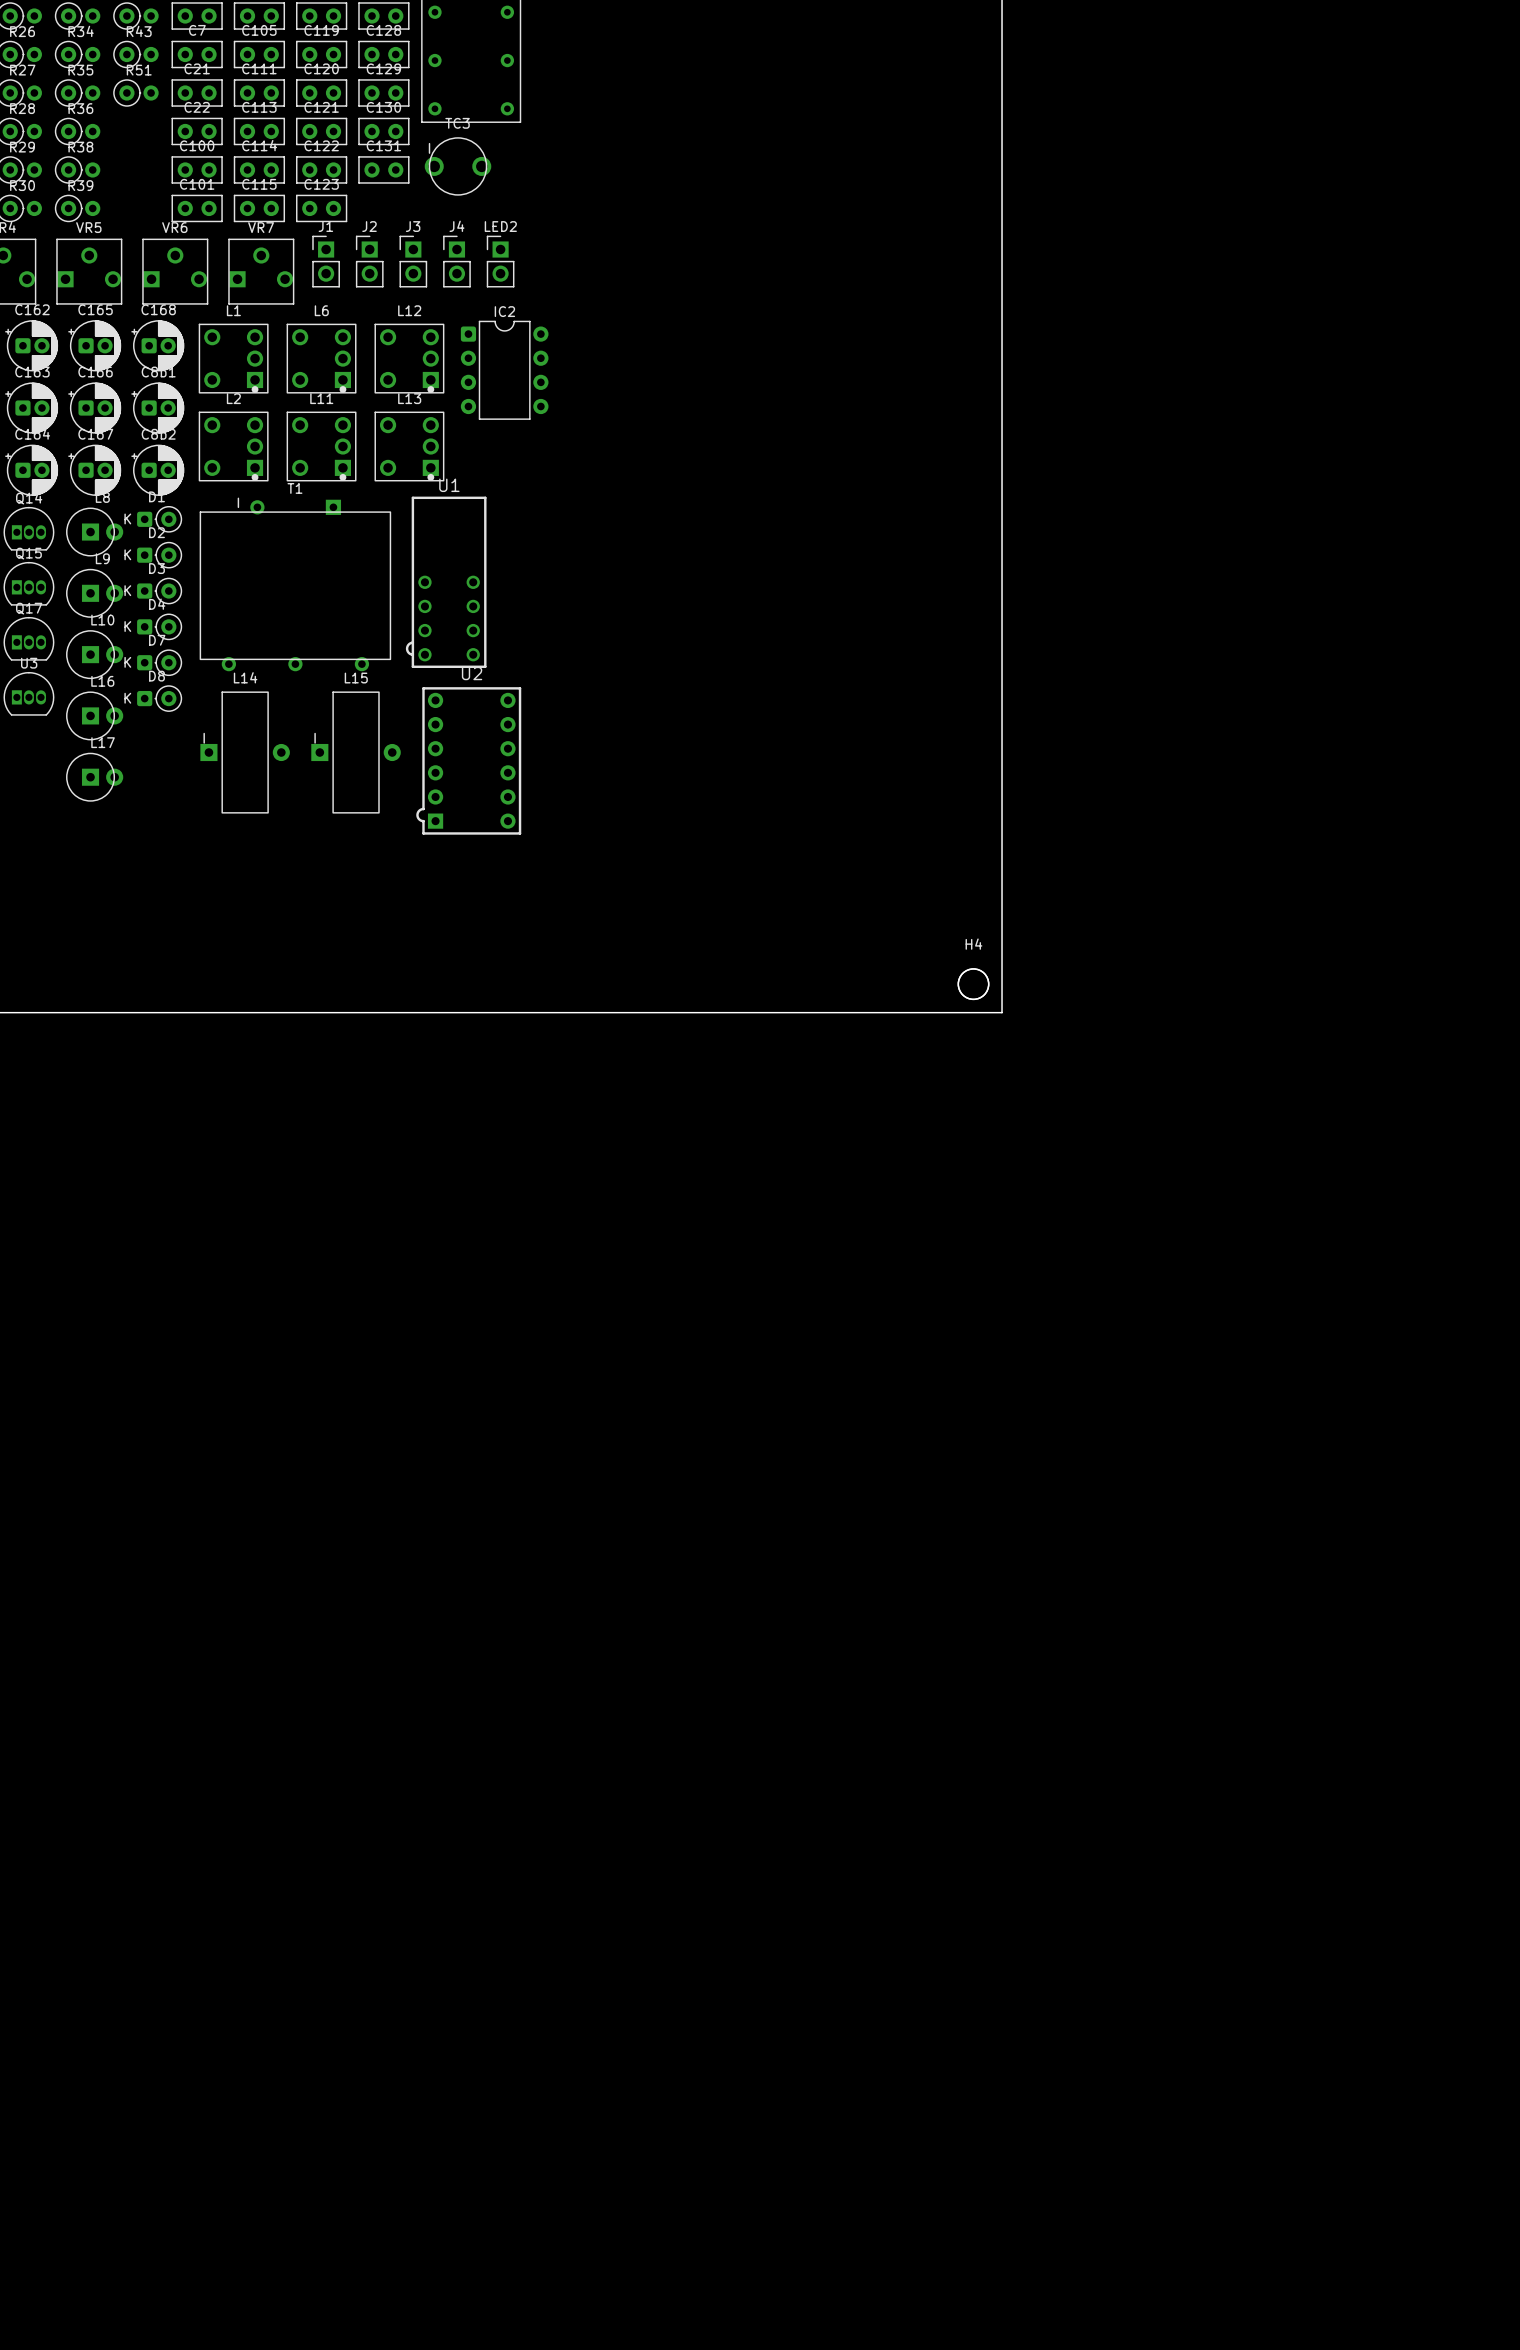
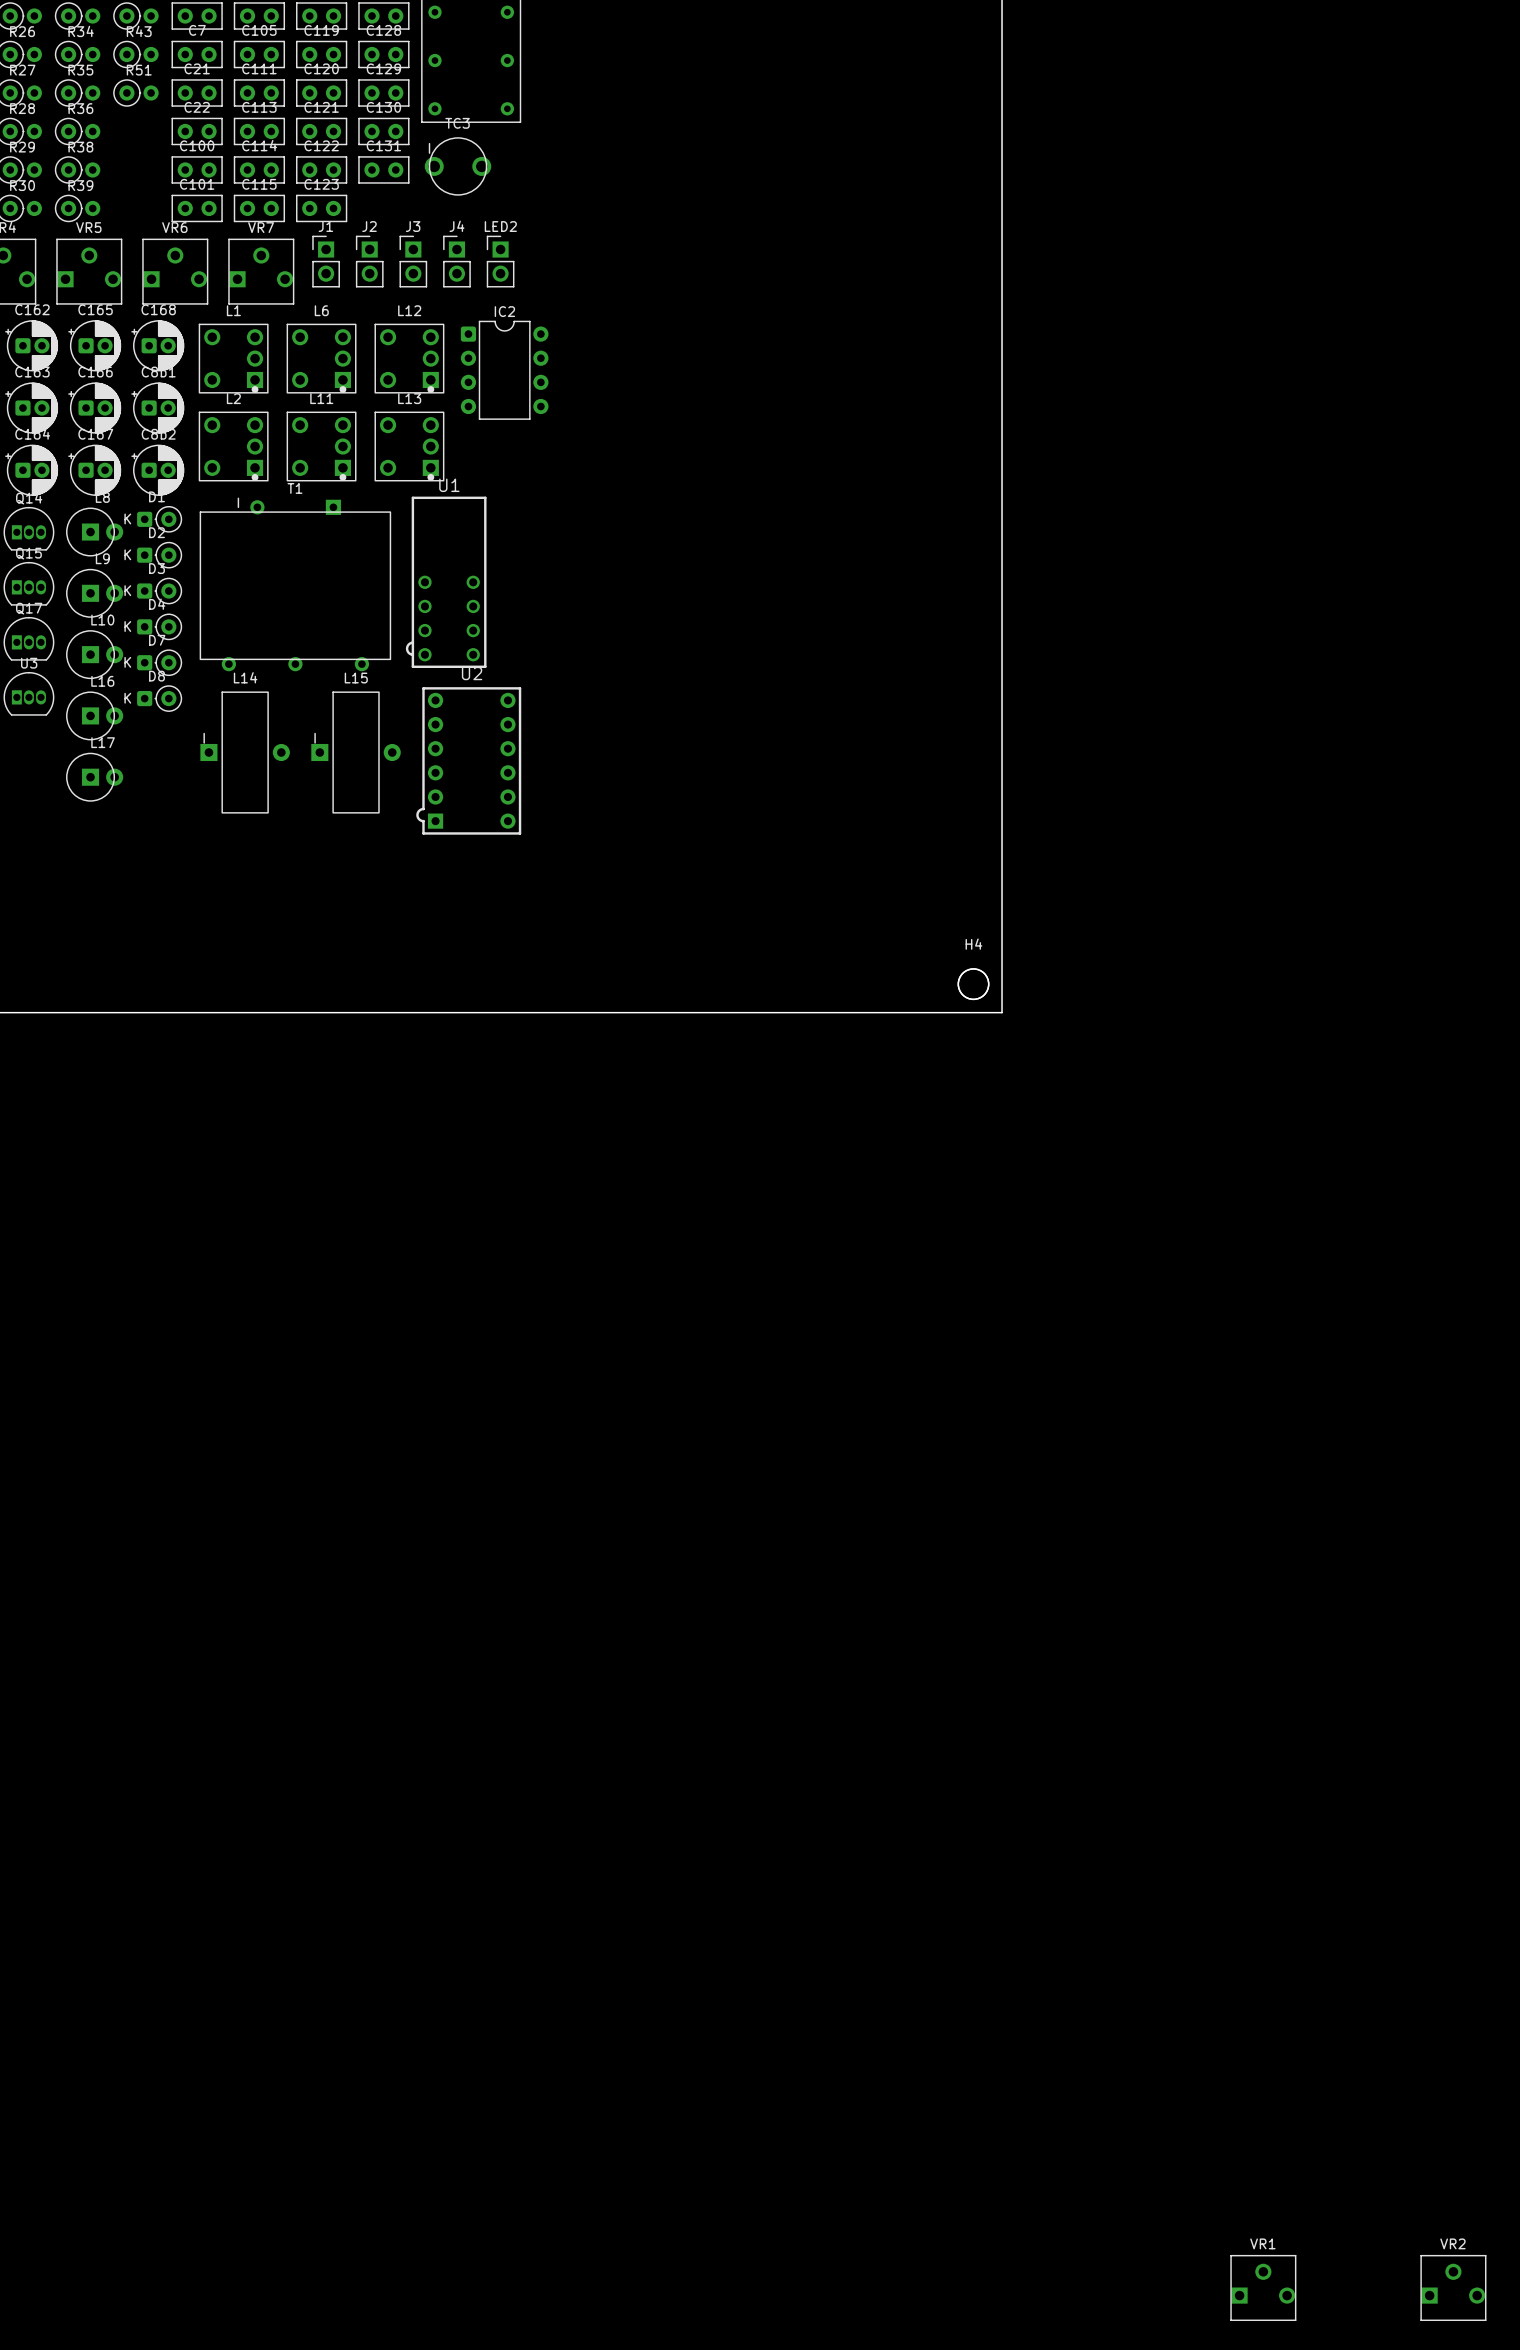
VR1: none -> (1263, 2287)
VR2: none -> (1453, 2287)

